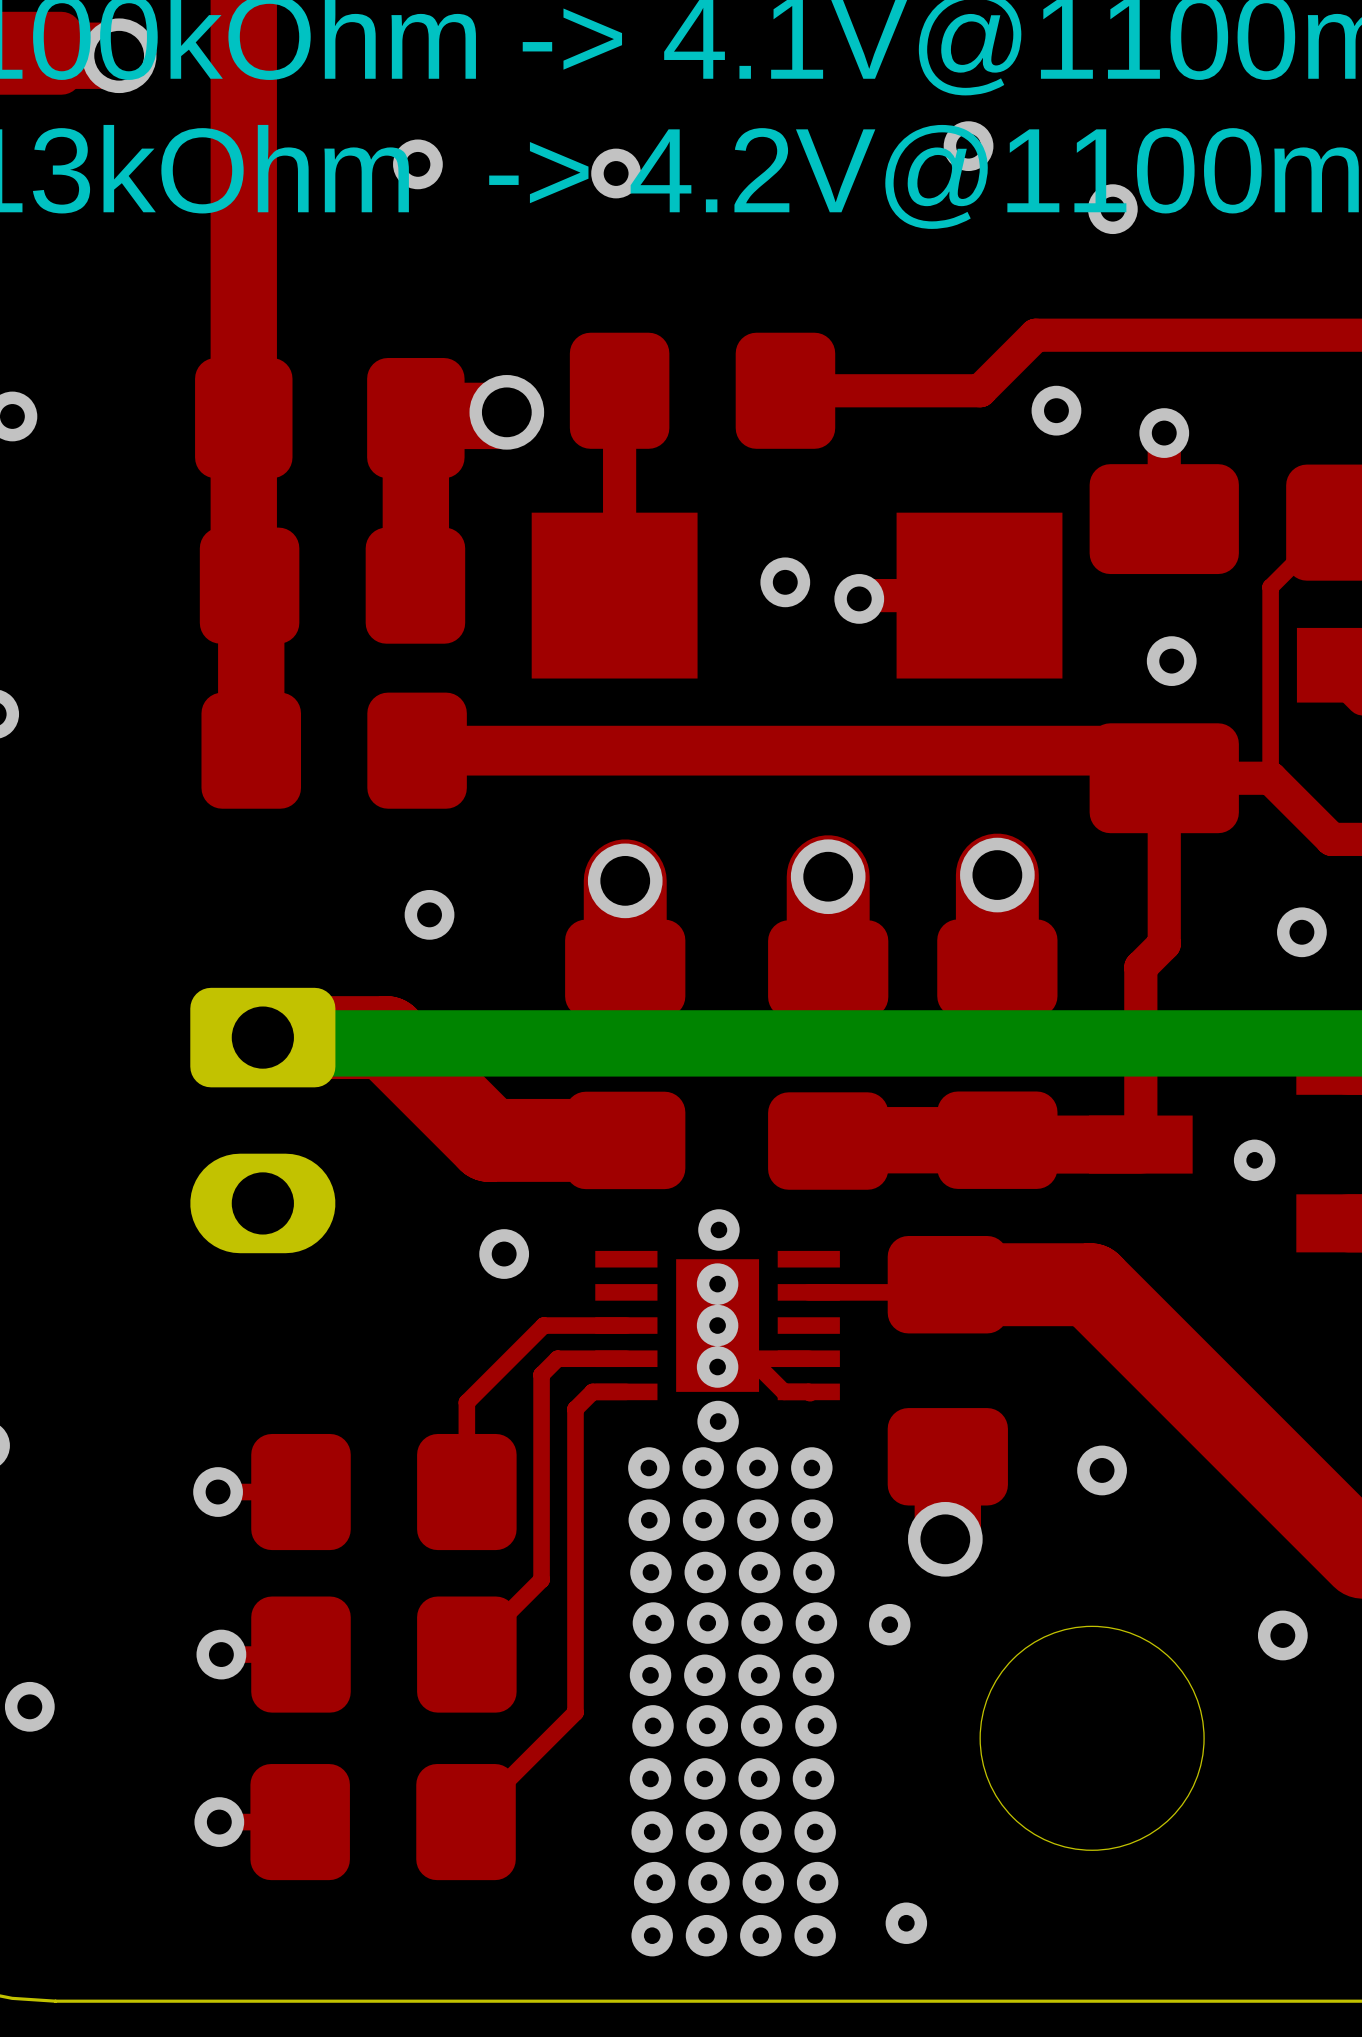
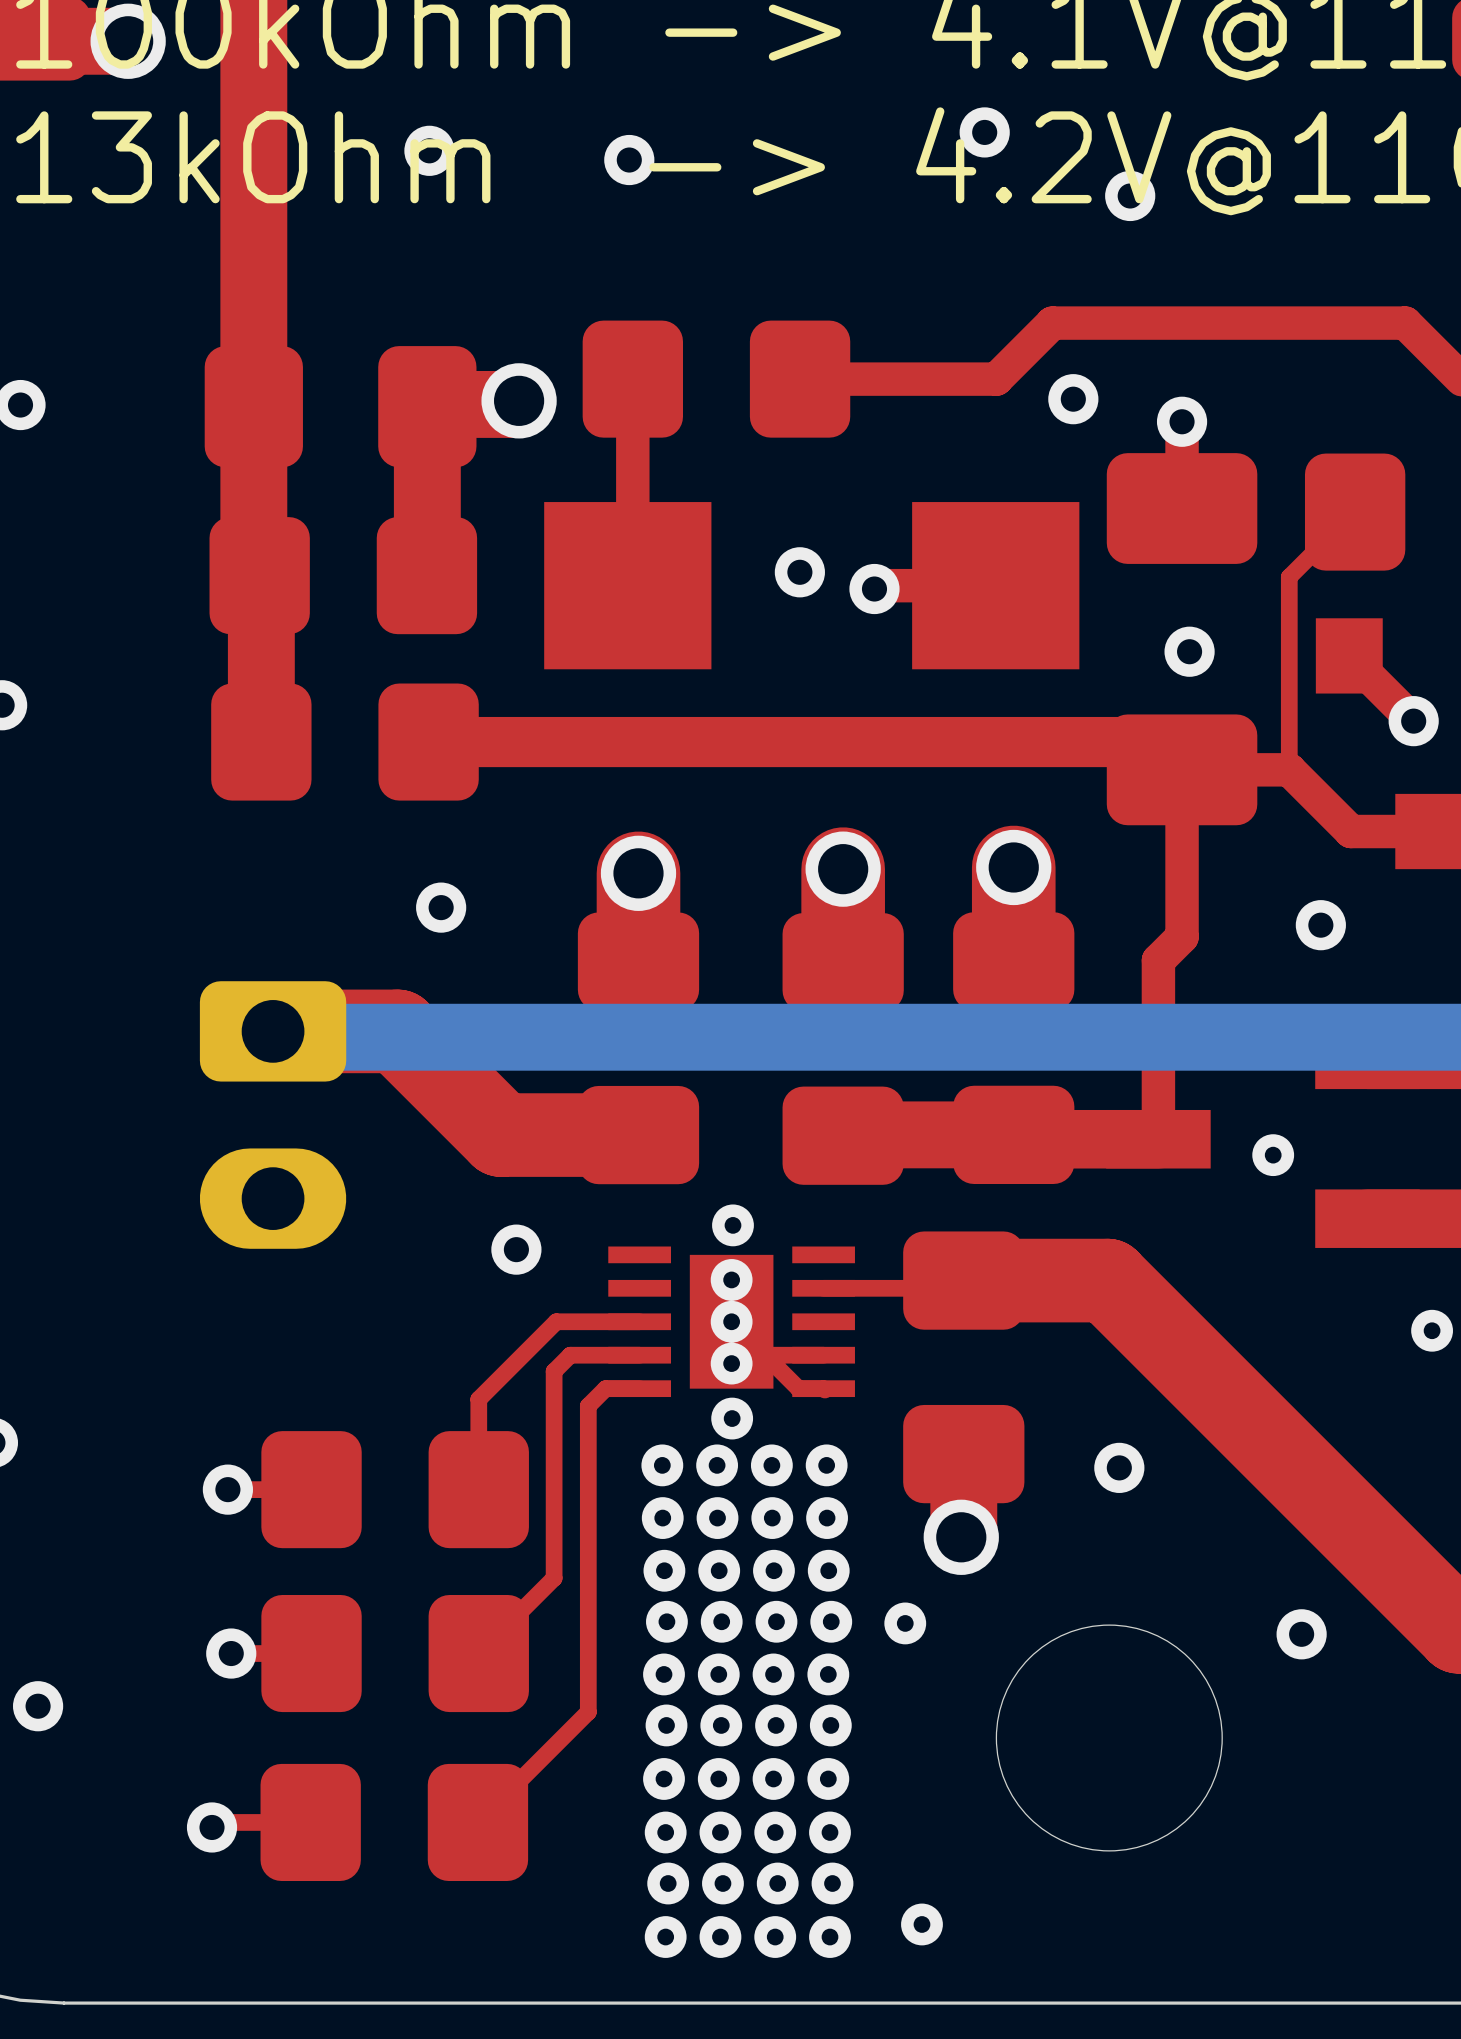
via position: (219, 1822) -> (212, 1827)

